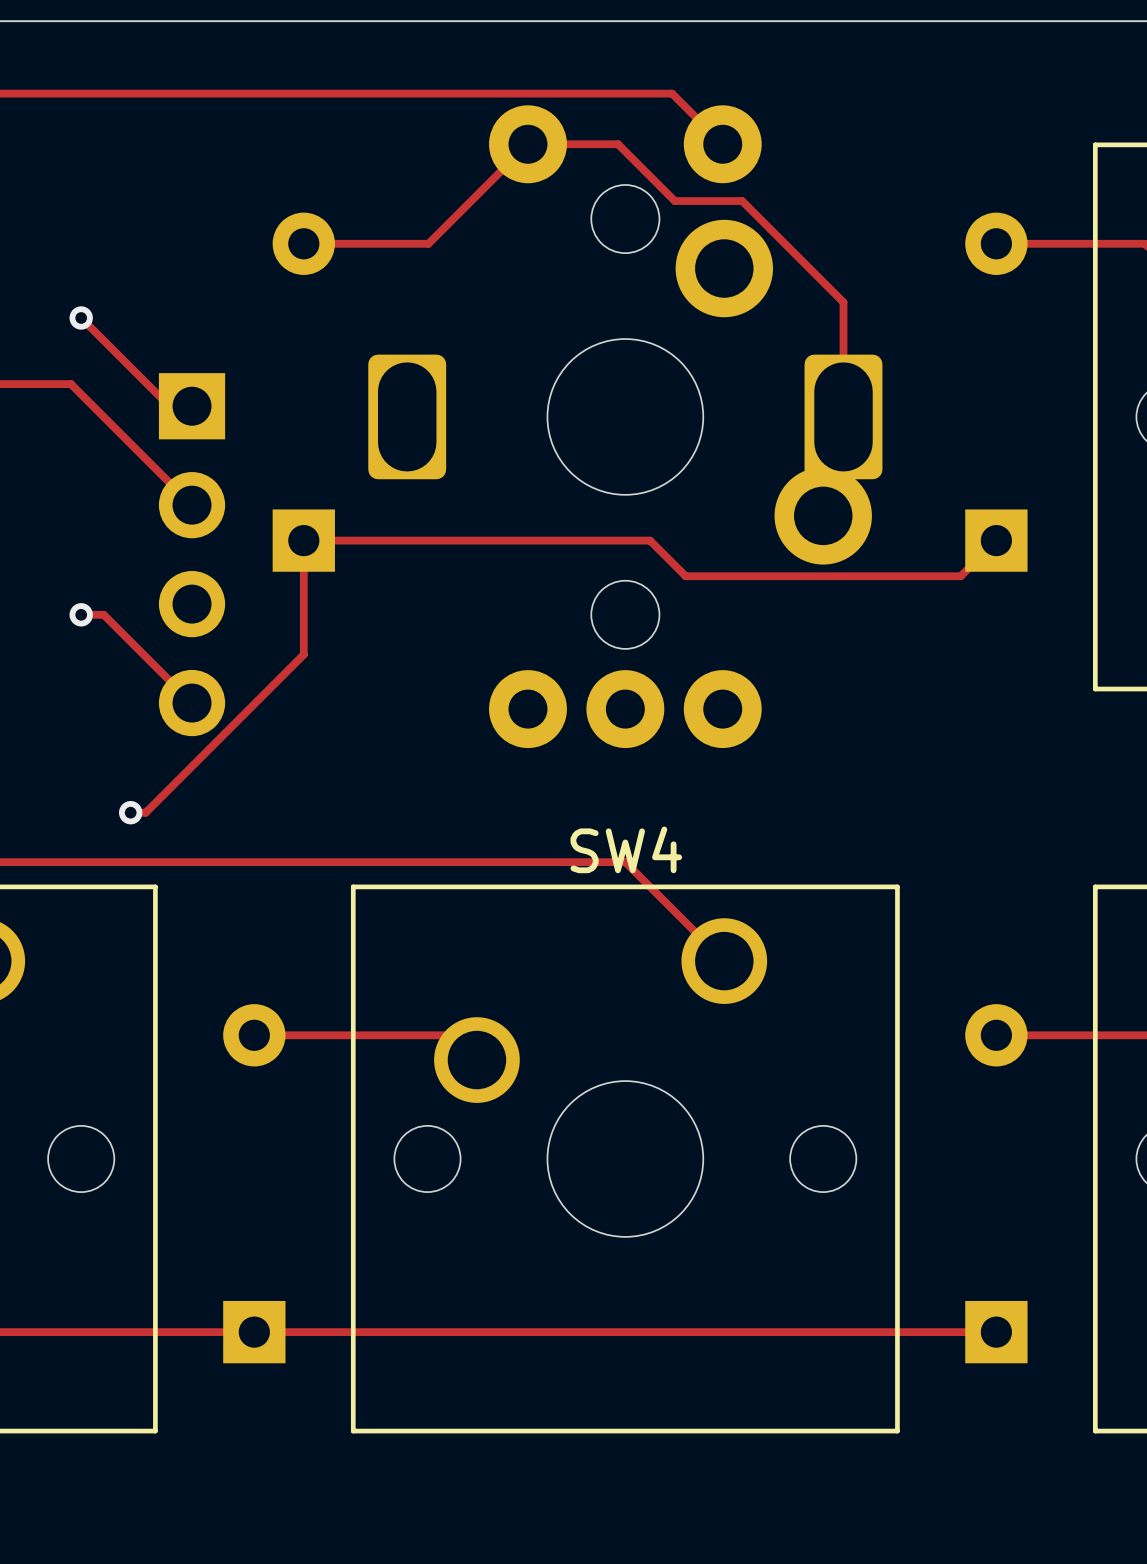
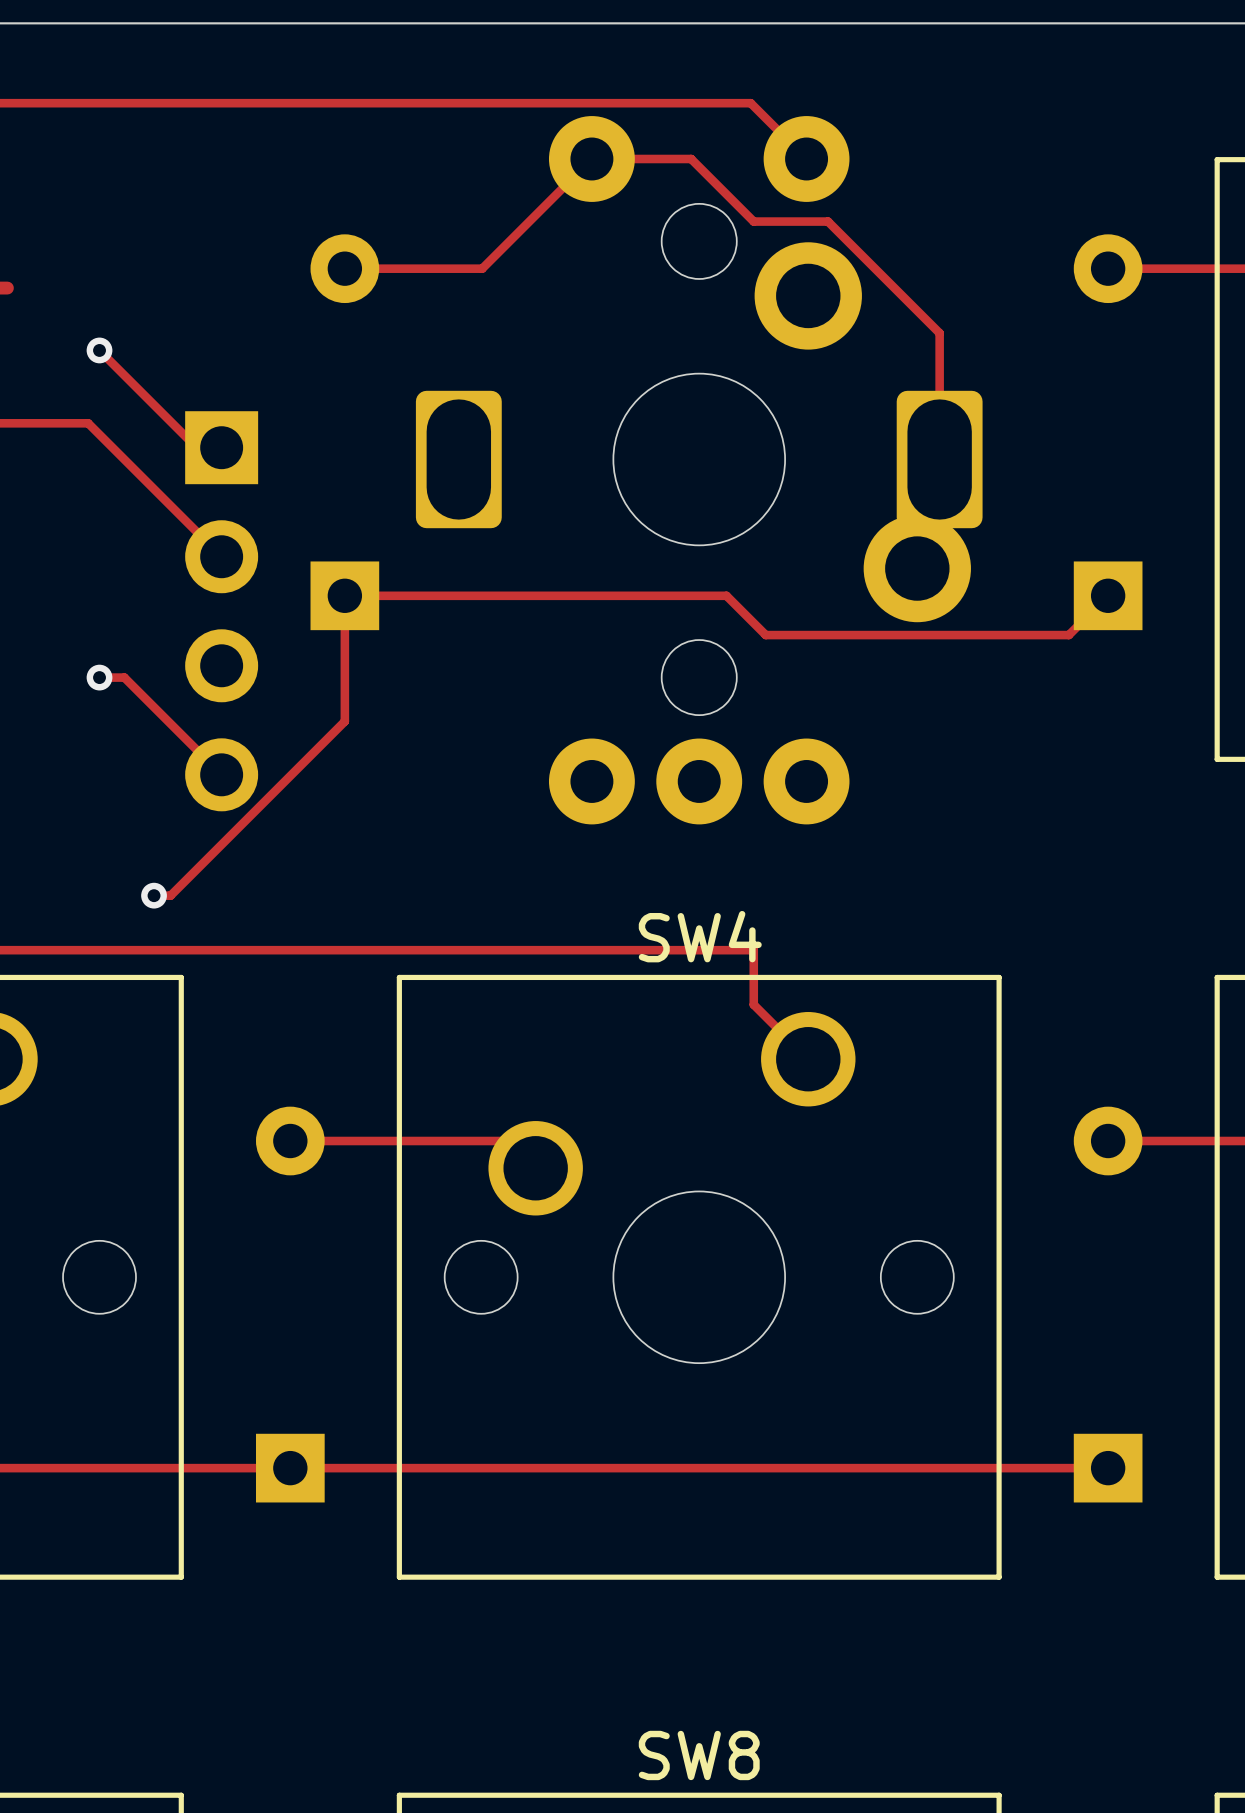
track: (625, 862) (674, 911) -> (699, 950) (753, 950) (753, 1004)

